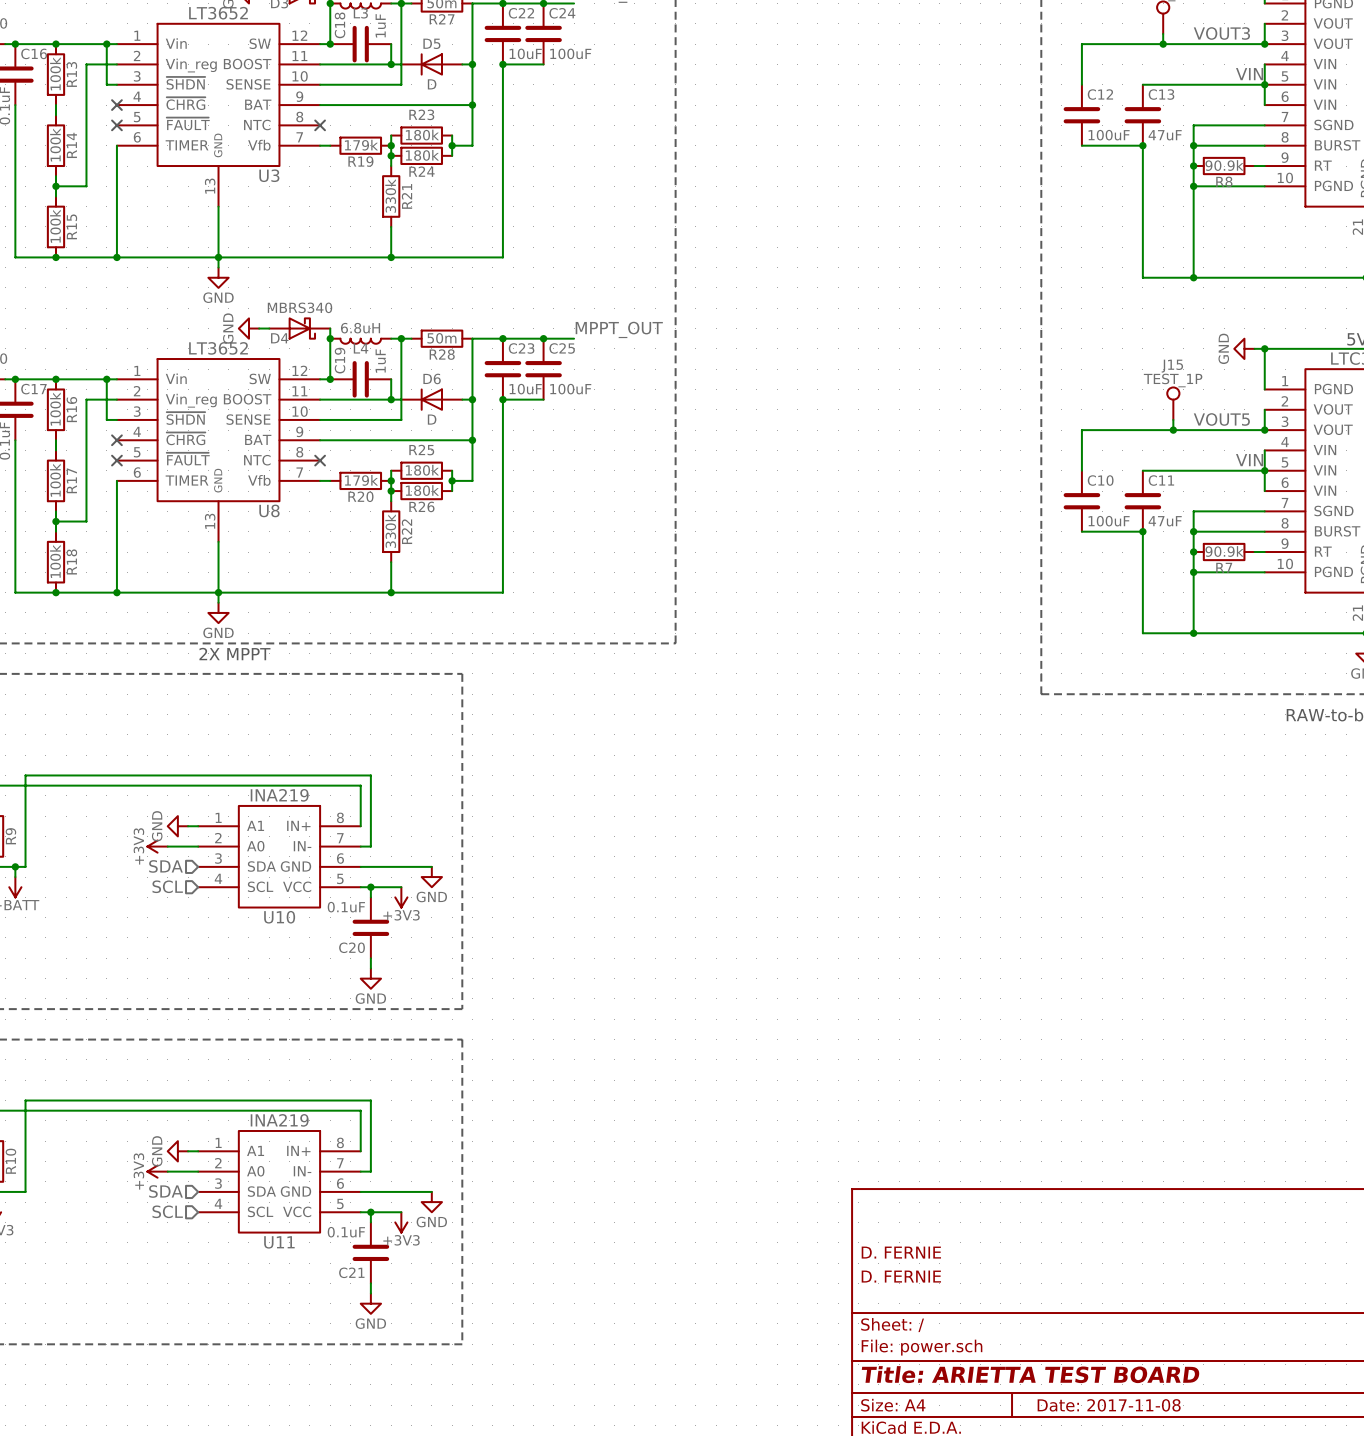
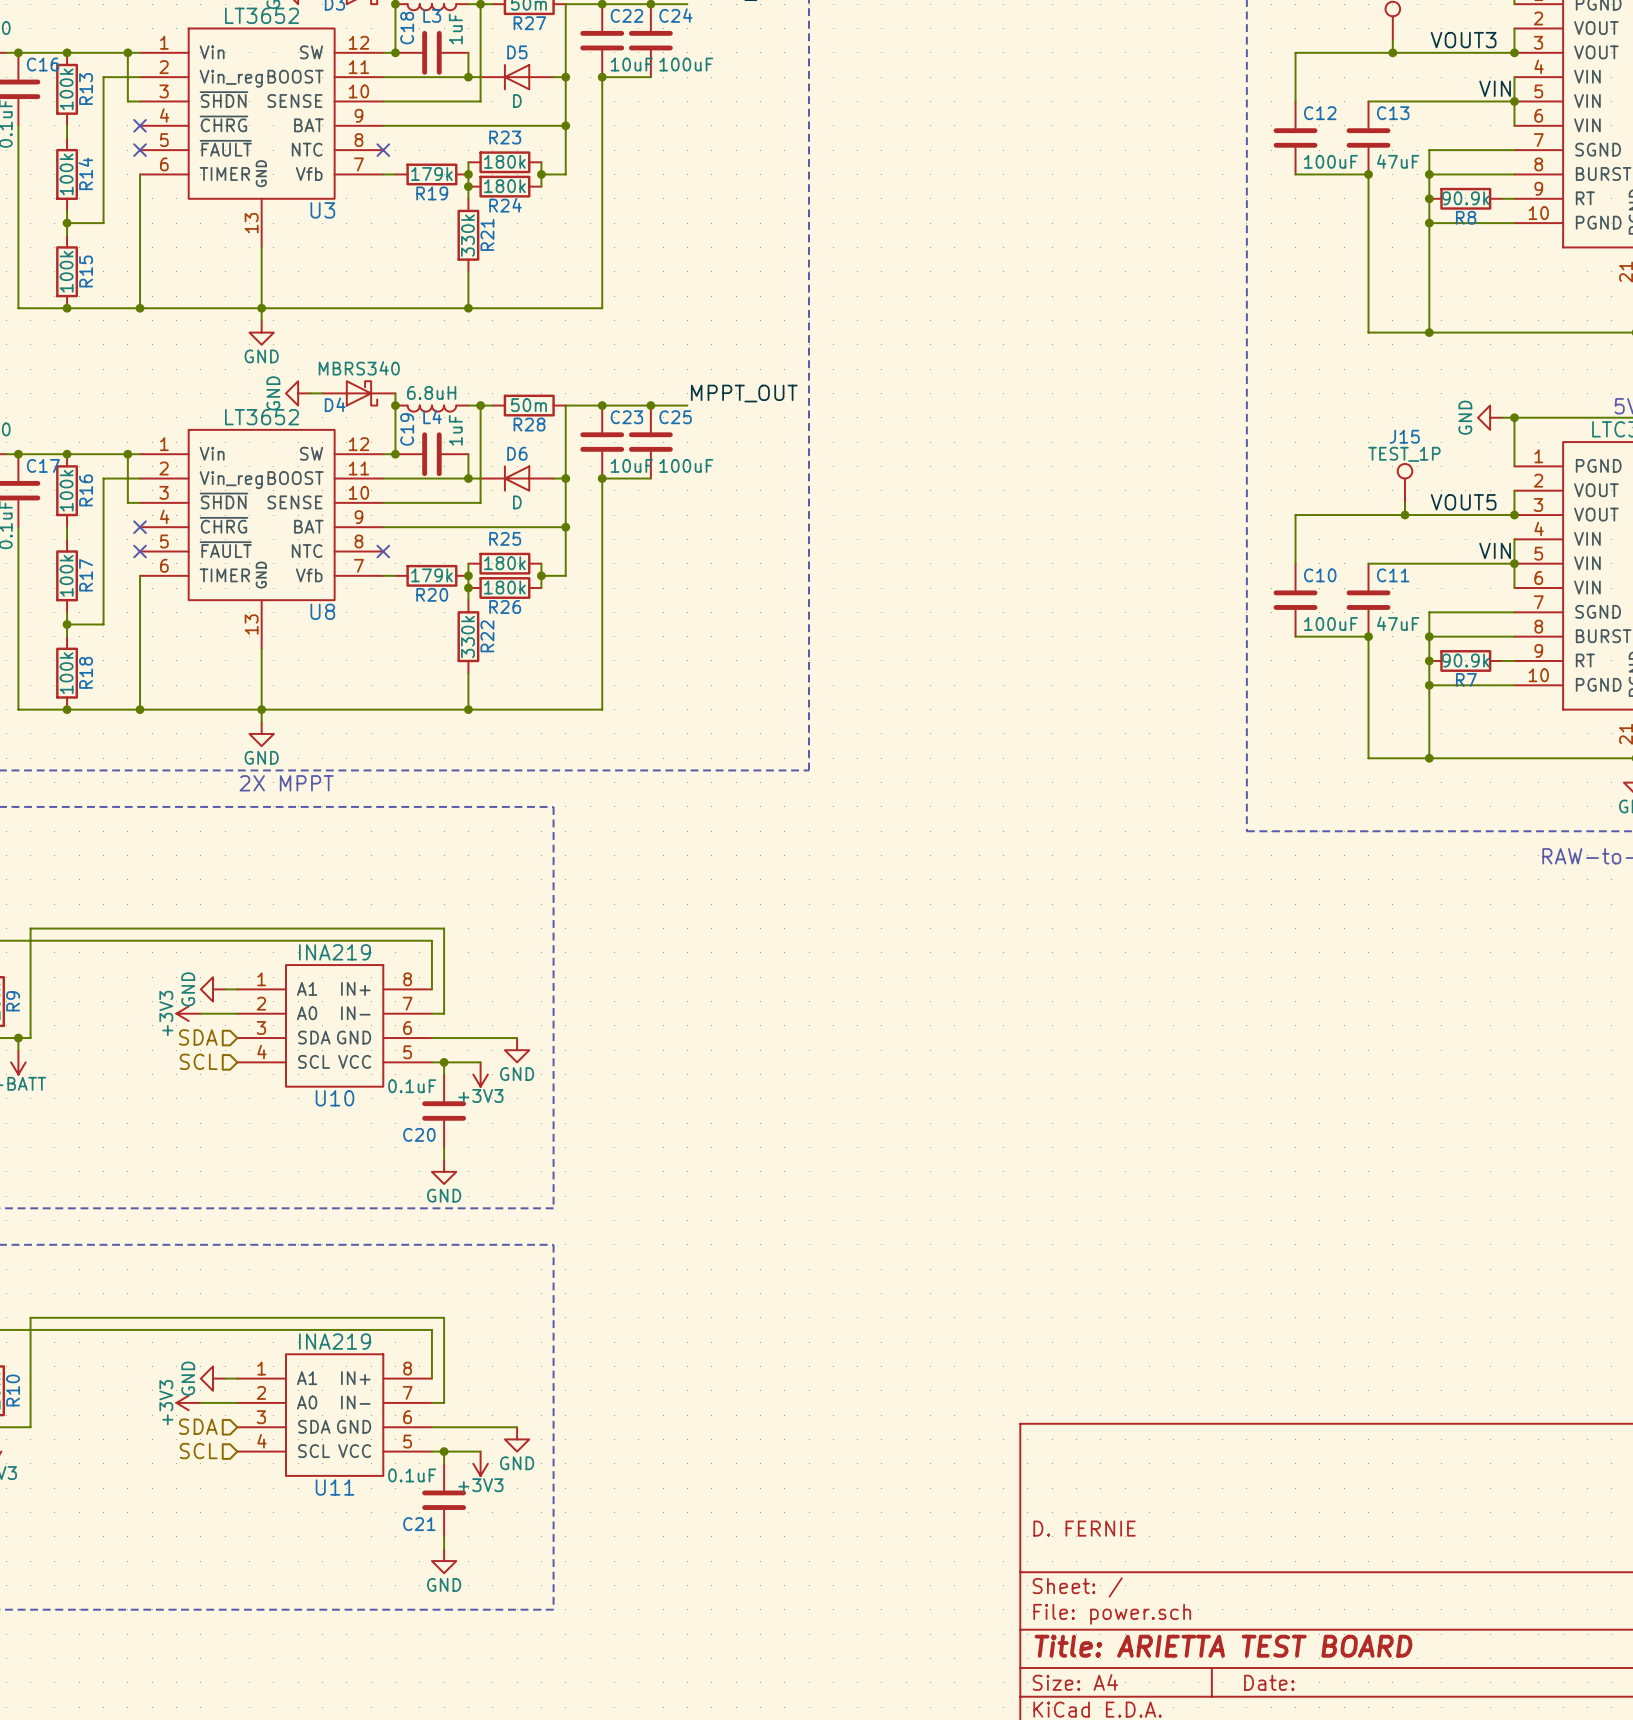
title block: D. FERNIE (901, 1252) -> none
title block: Date: 2017-11-08 (1109, 1405) -> Date: (1269, 1682)

